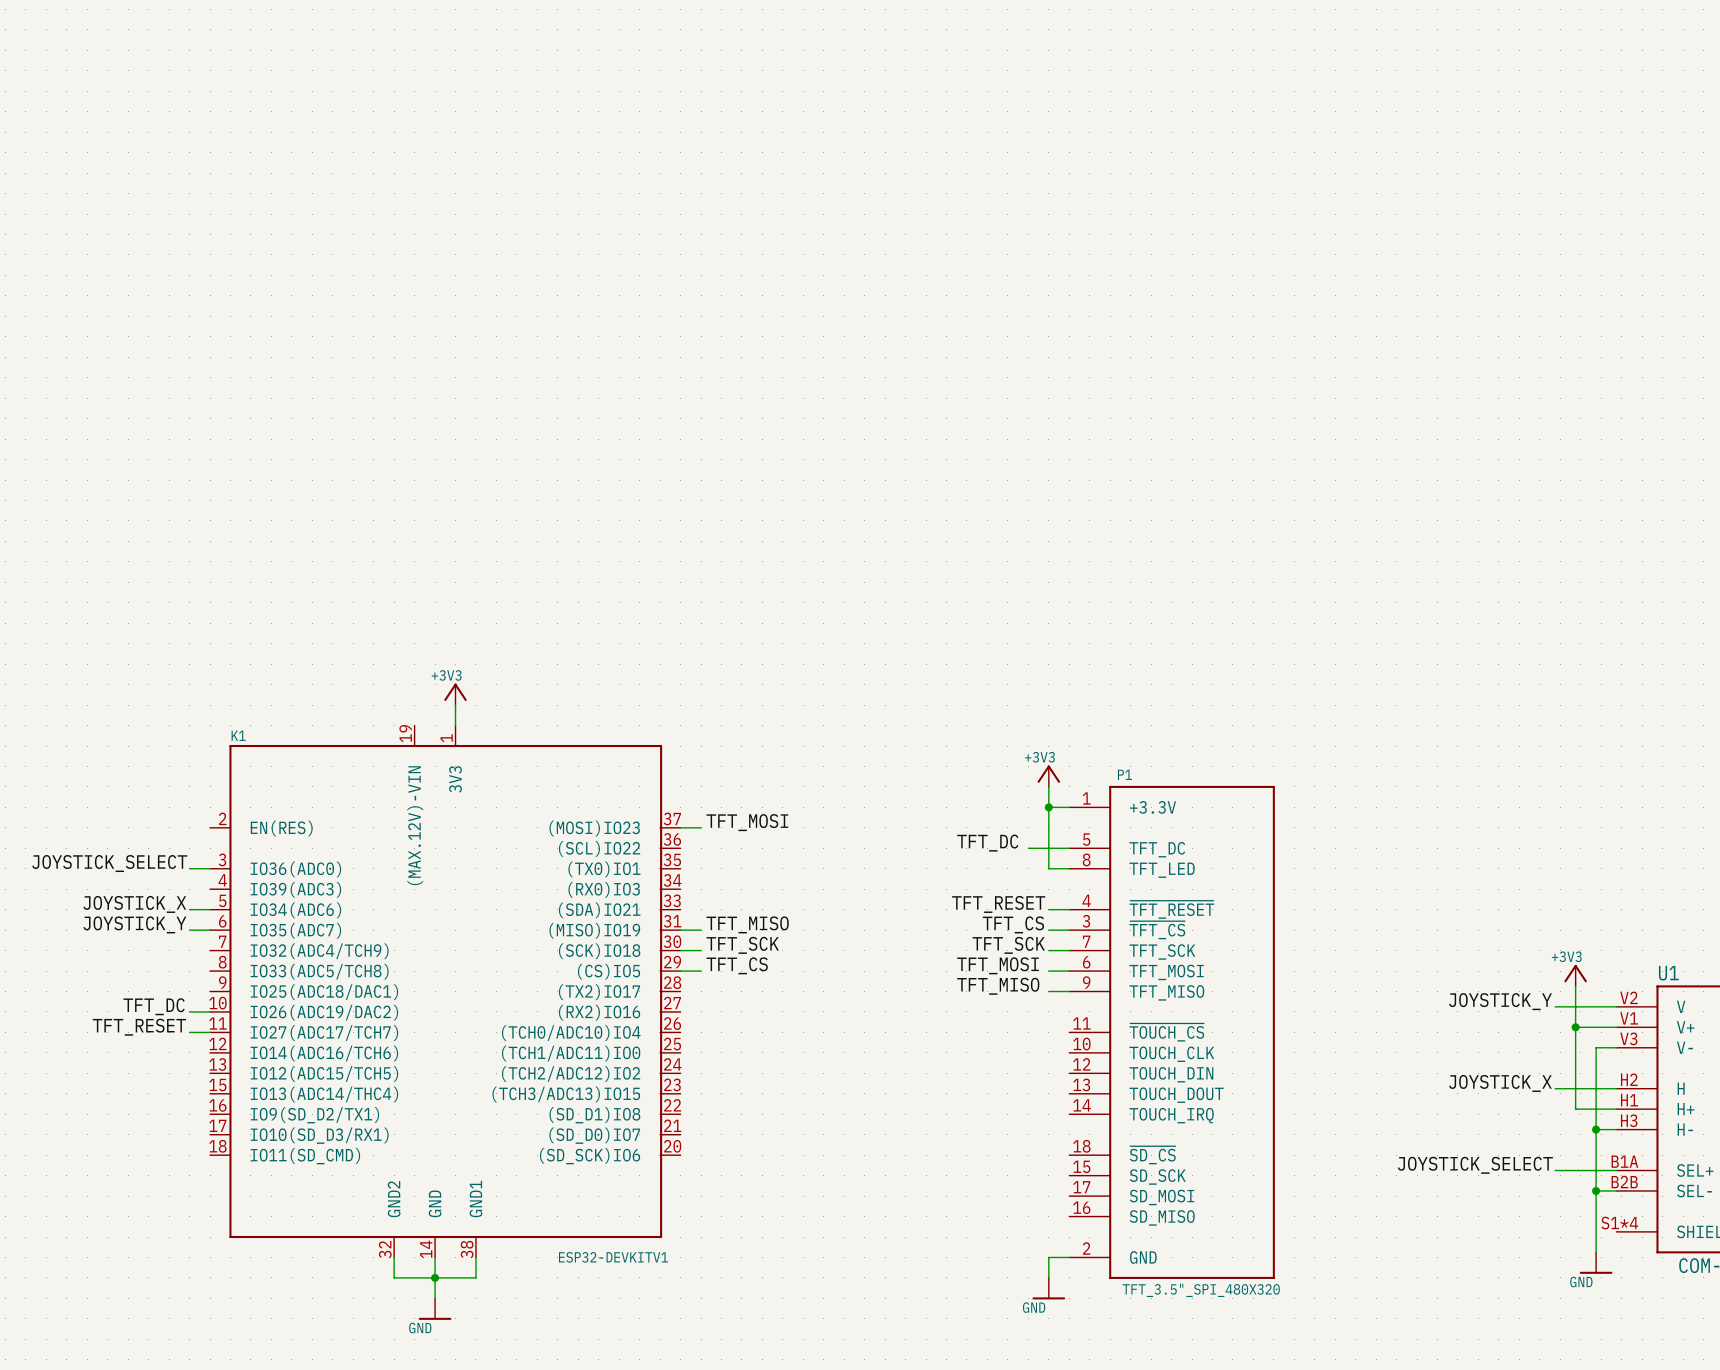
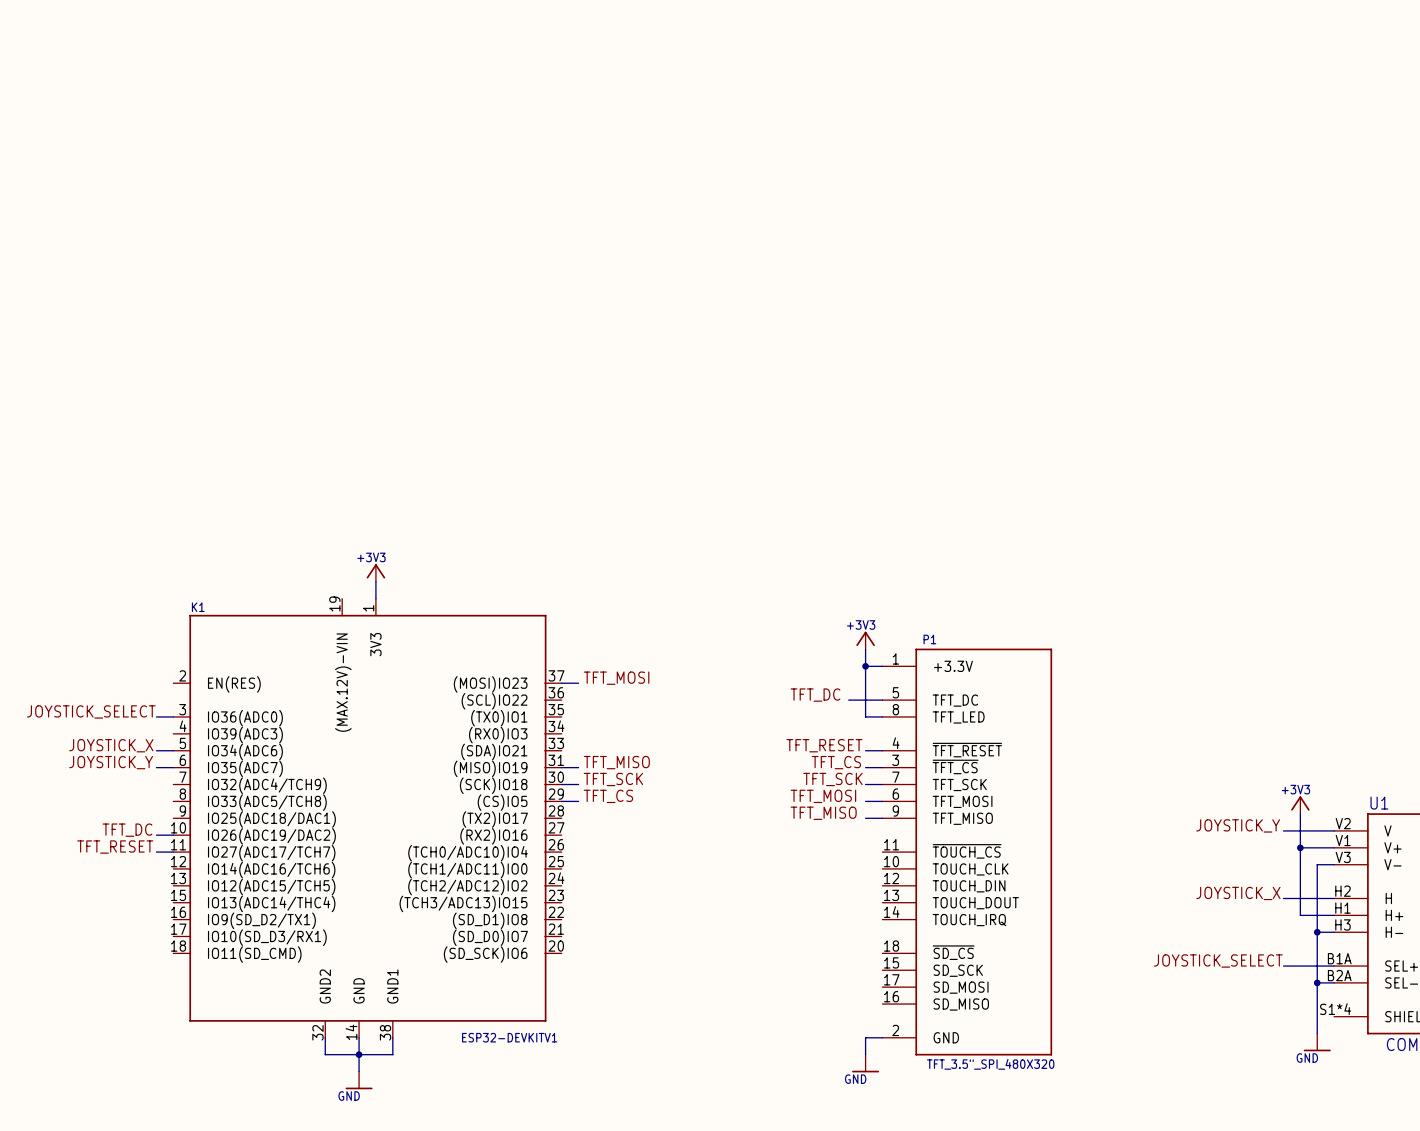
U1 pin number: B2B (1624, 1182) -> B2A (1339, 975)

